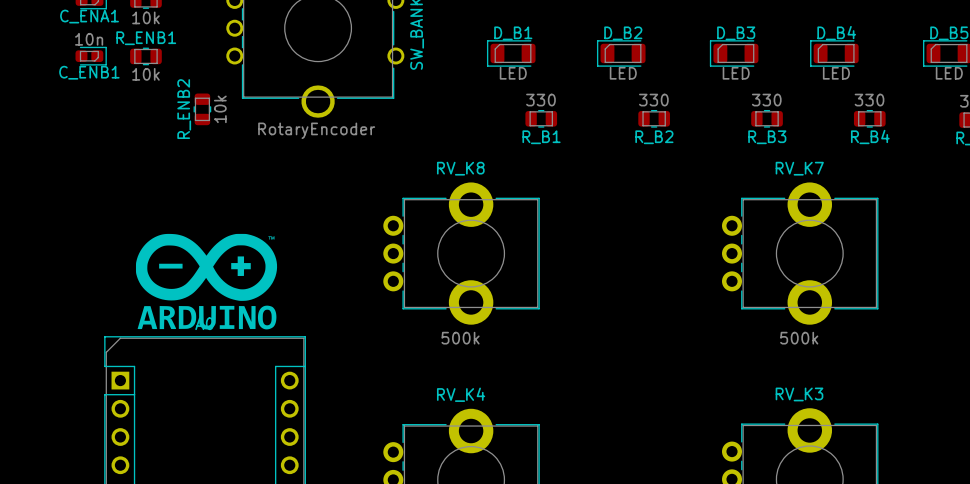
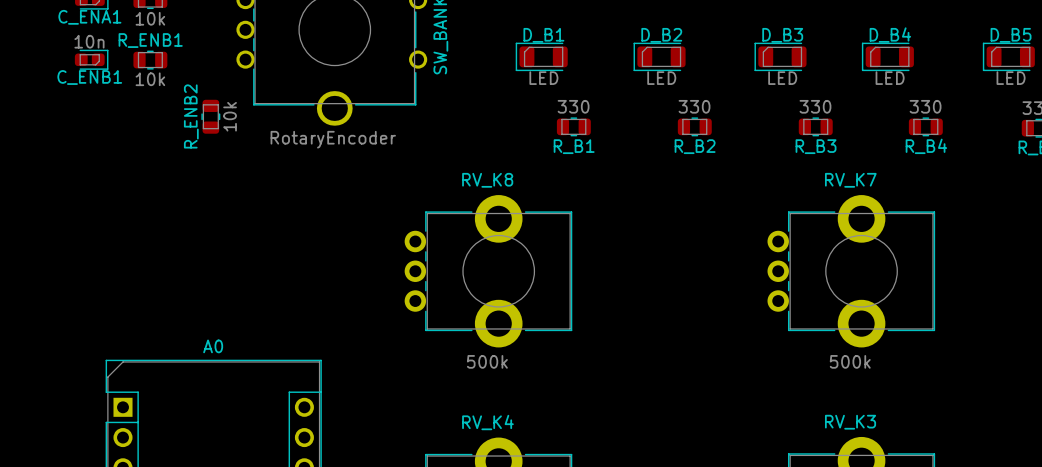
drawing: [135, 233, 278, 330] -> none

